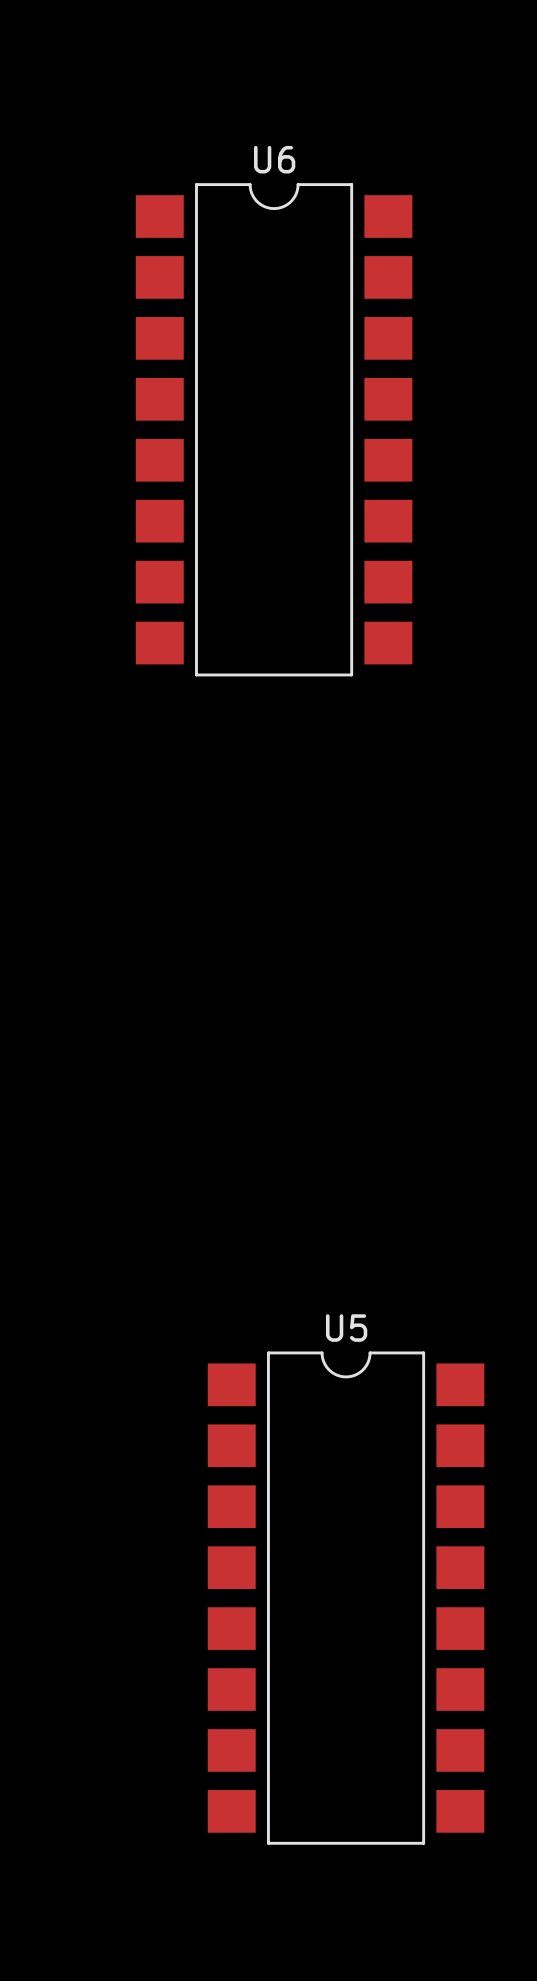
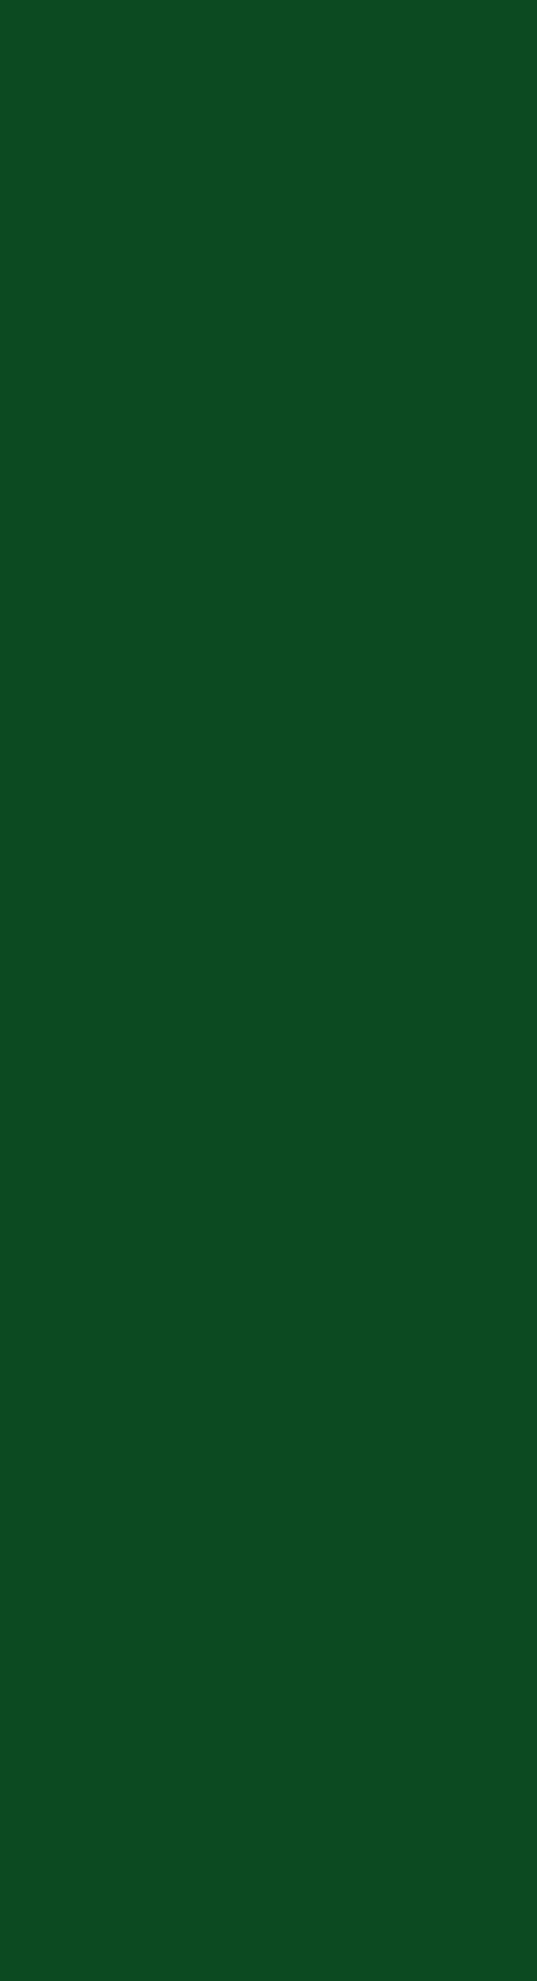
U6: (274, 429) -> none
U5: (346, 1598) -> none

